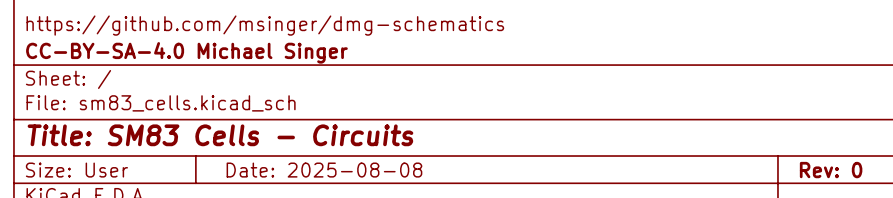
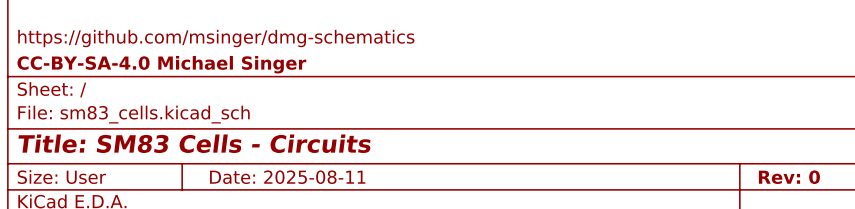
title block: Date: 2025-08-08 (324, 170) -> Date: 2025-08-11 (287, 177)

